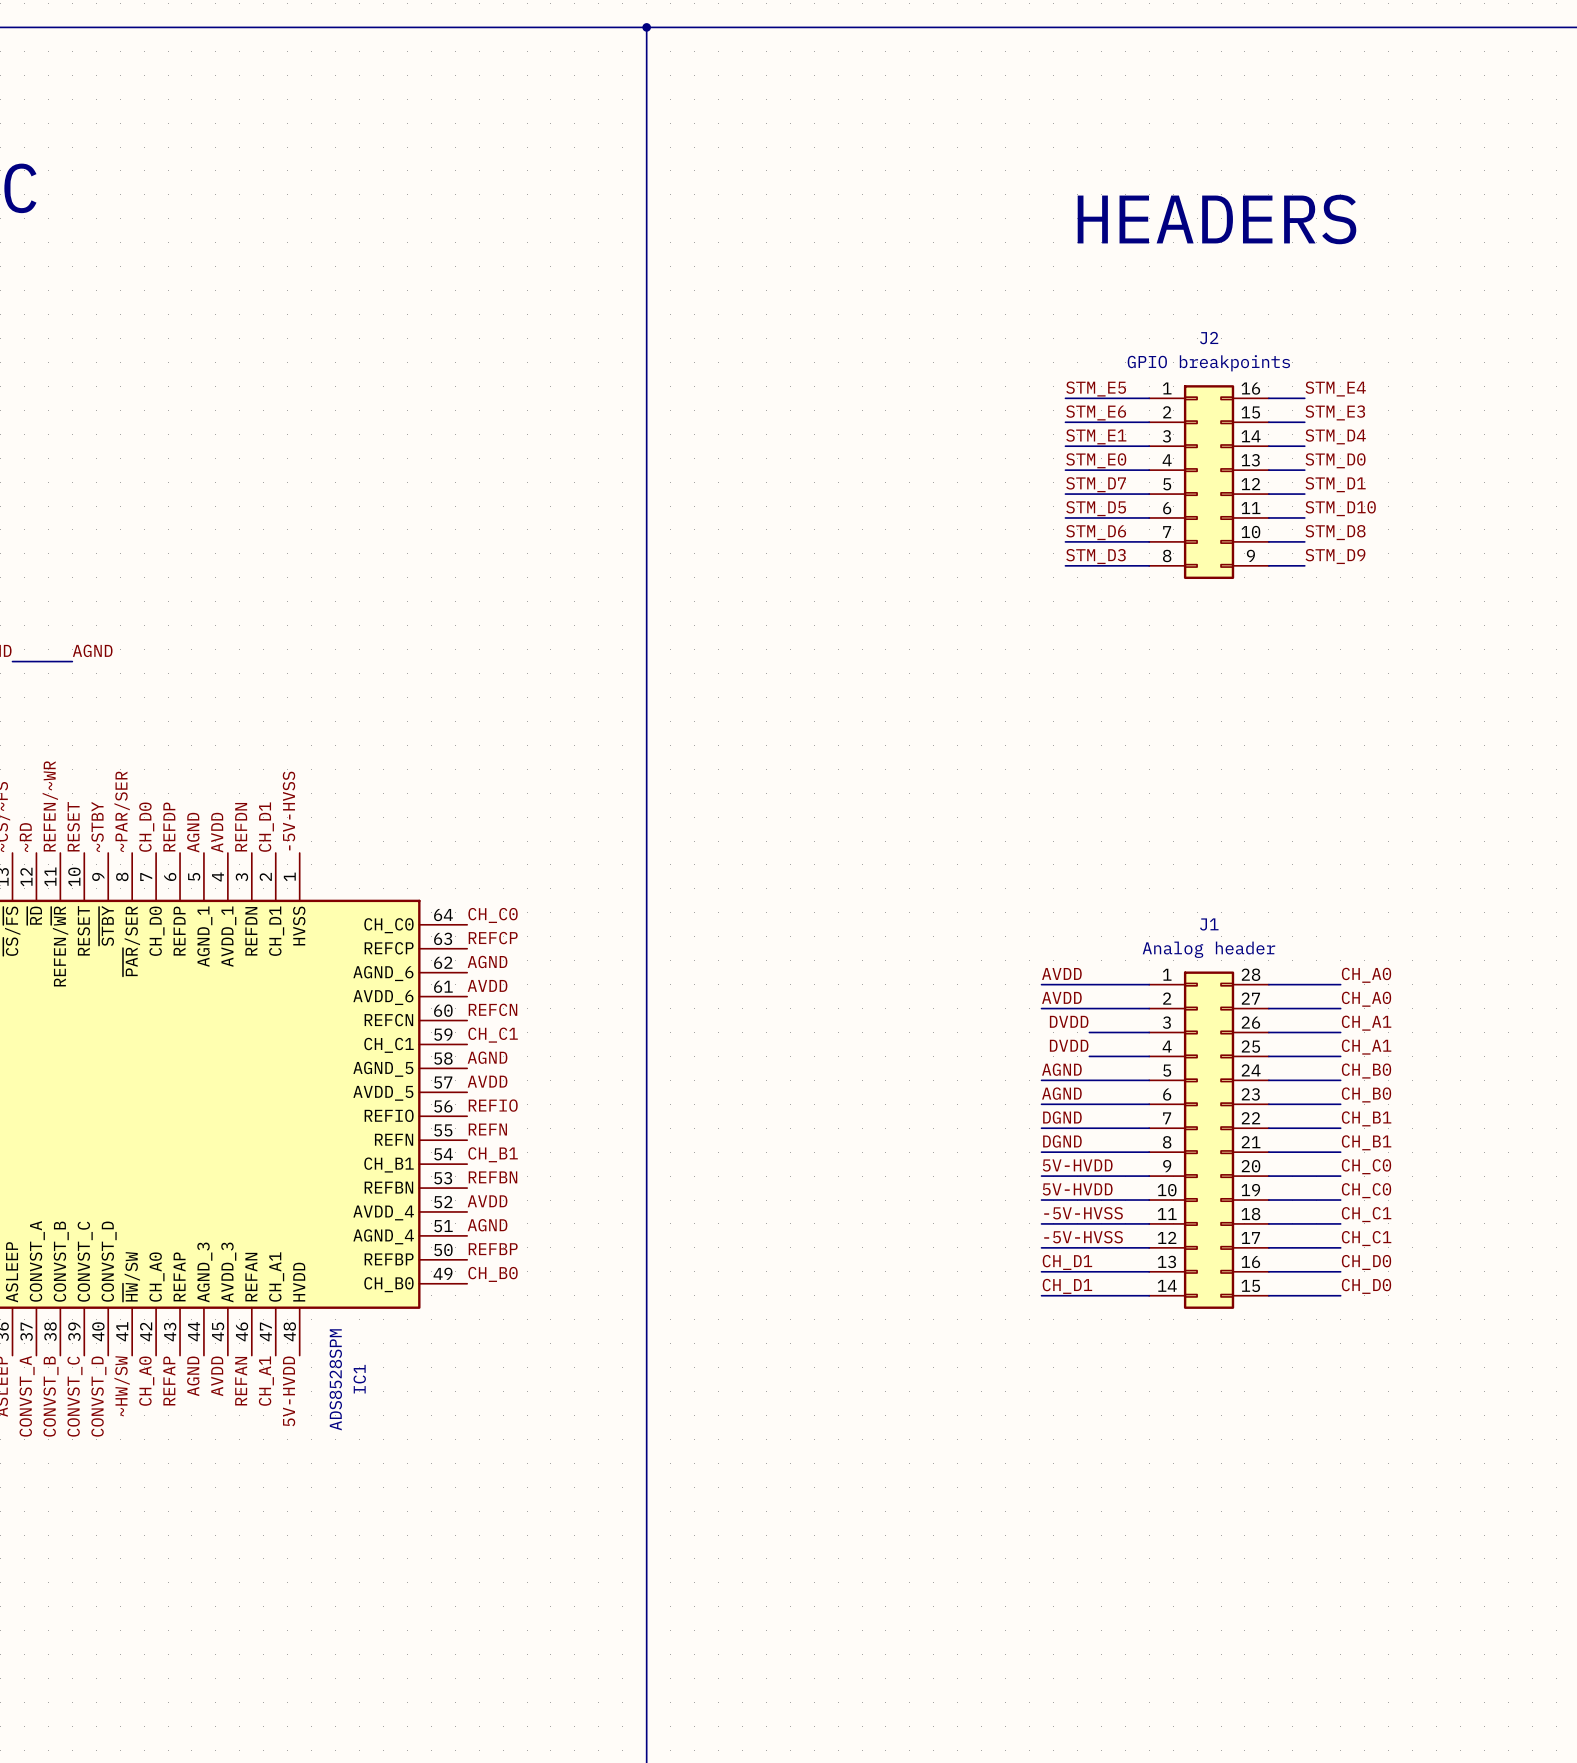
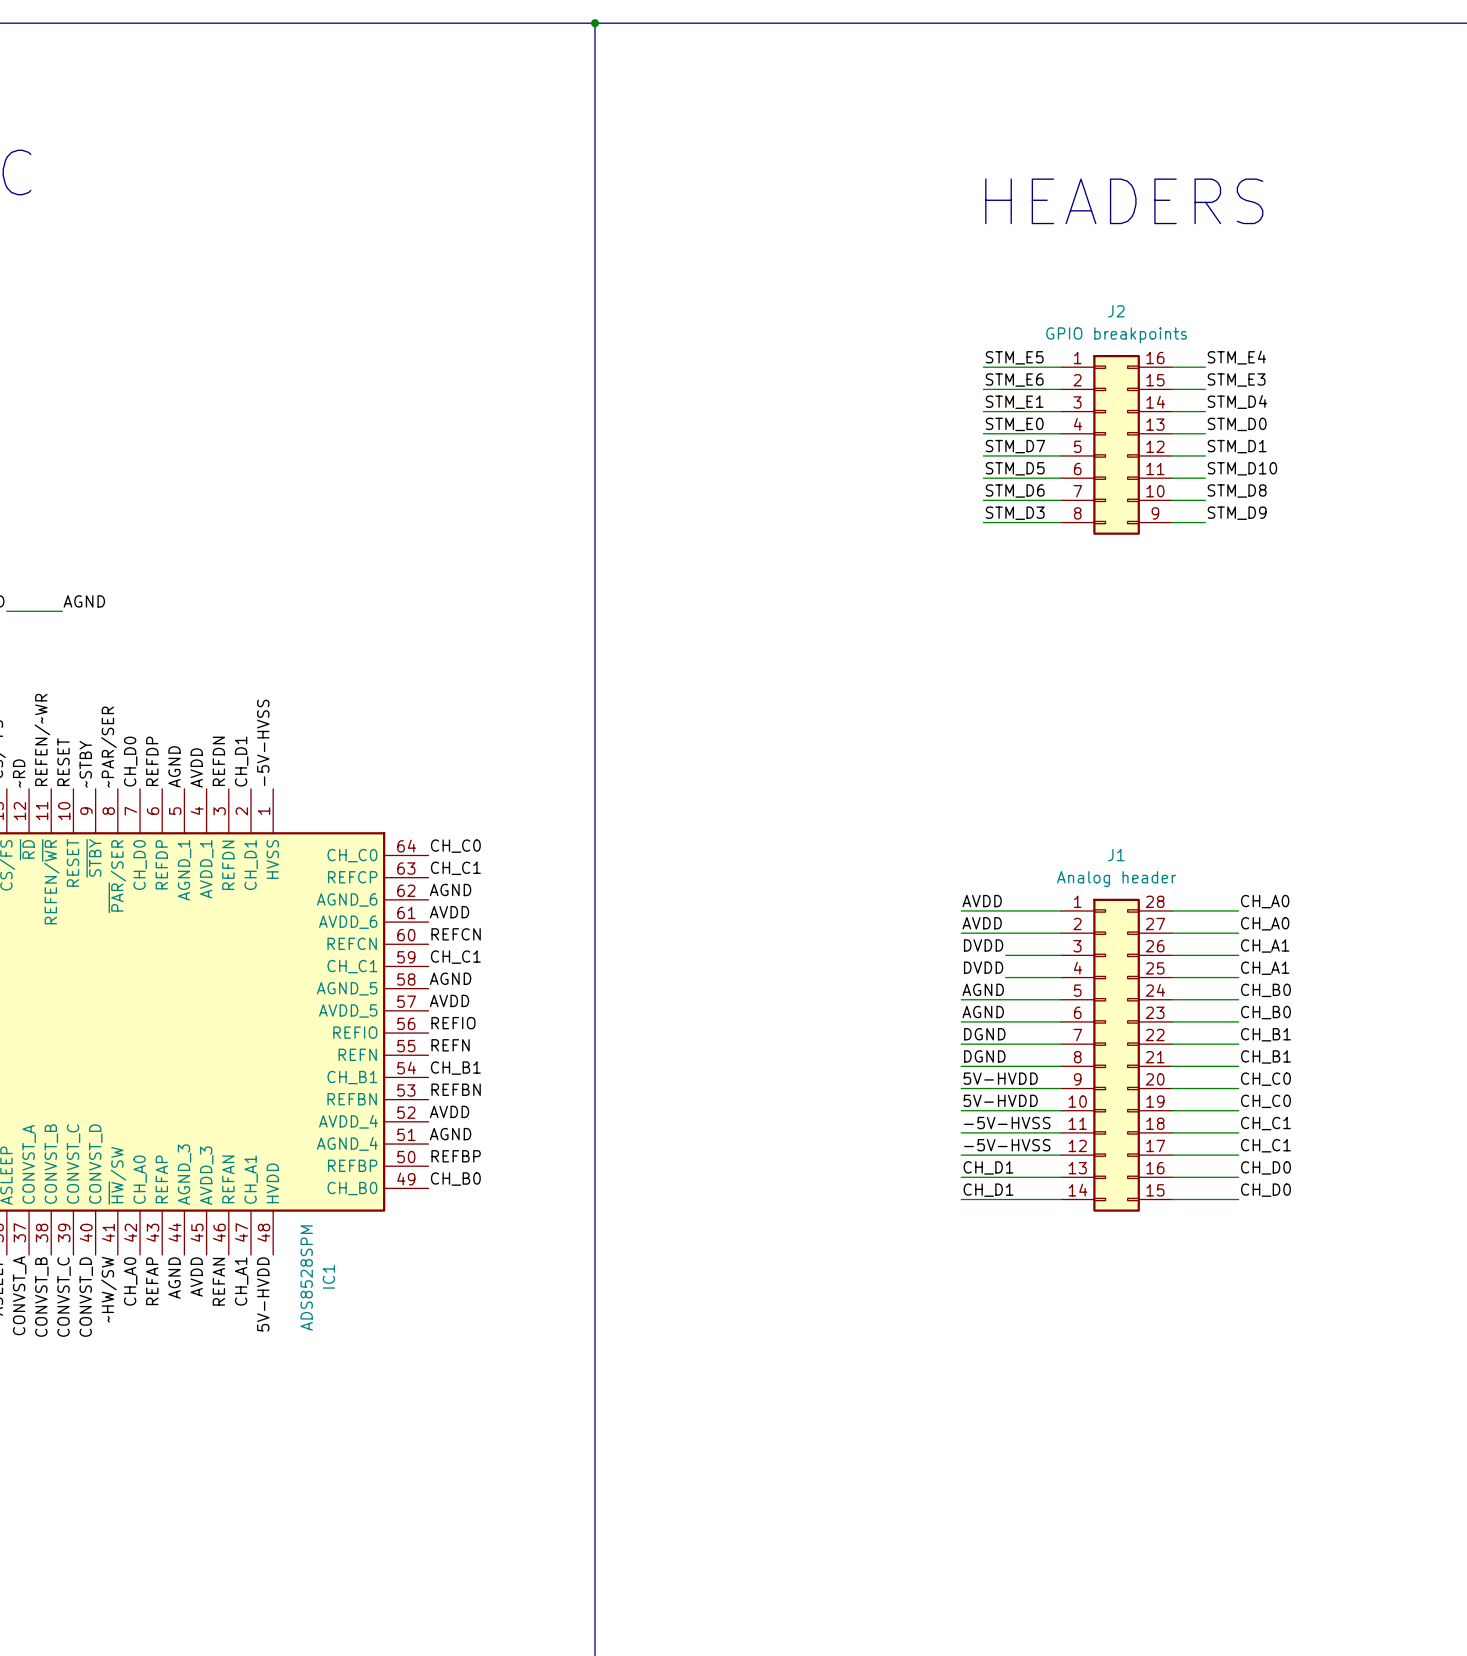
label: REFCP (493, 938) -> CH_C1 (455, 868)

